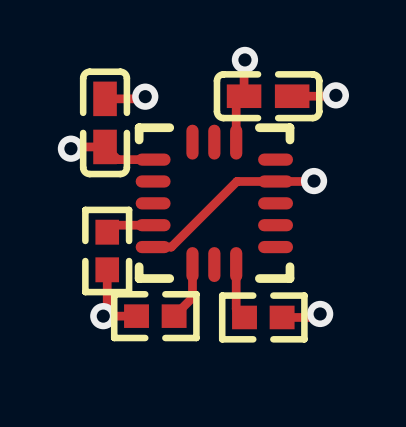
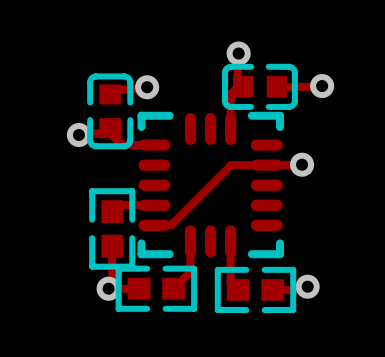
part footprint: [79, 68, 131, 178] -> [87, 73, 134, 150]
part footprint: [213, 71, 323, 122] -> [221, 63, 298, 110]

